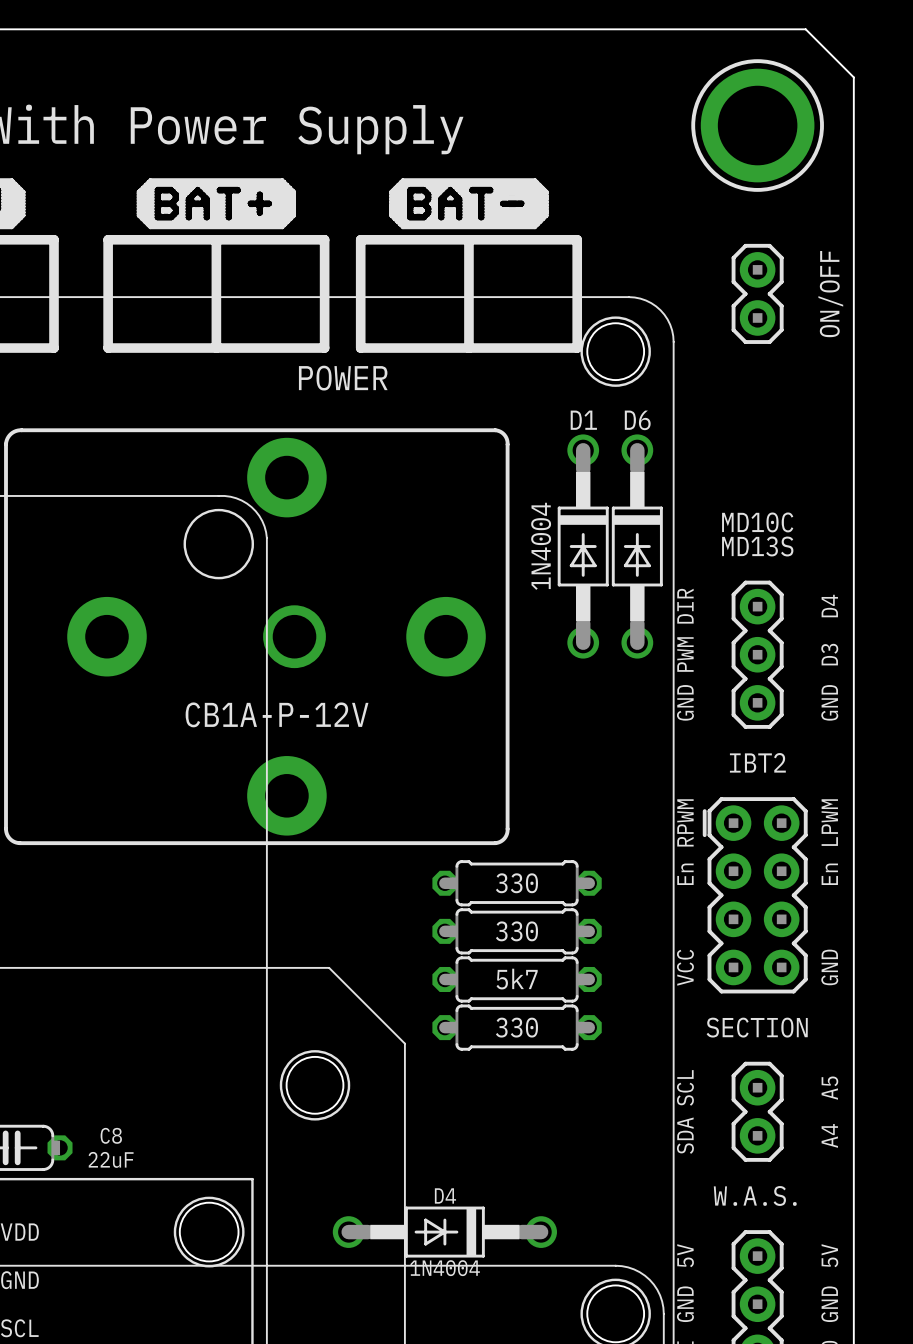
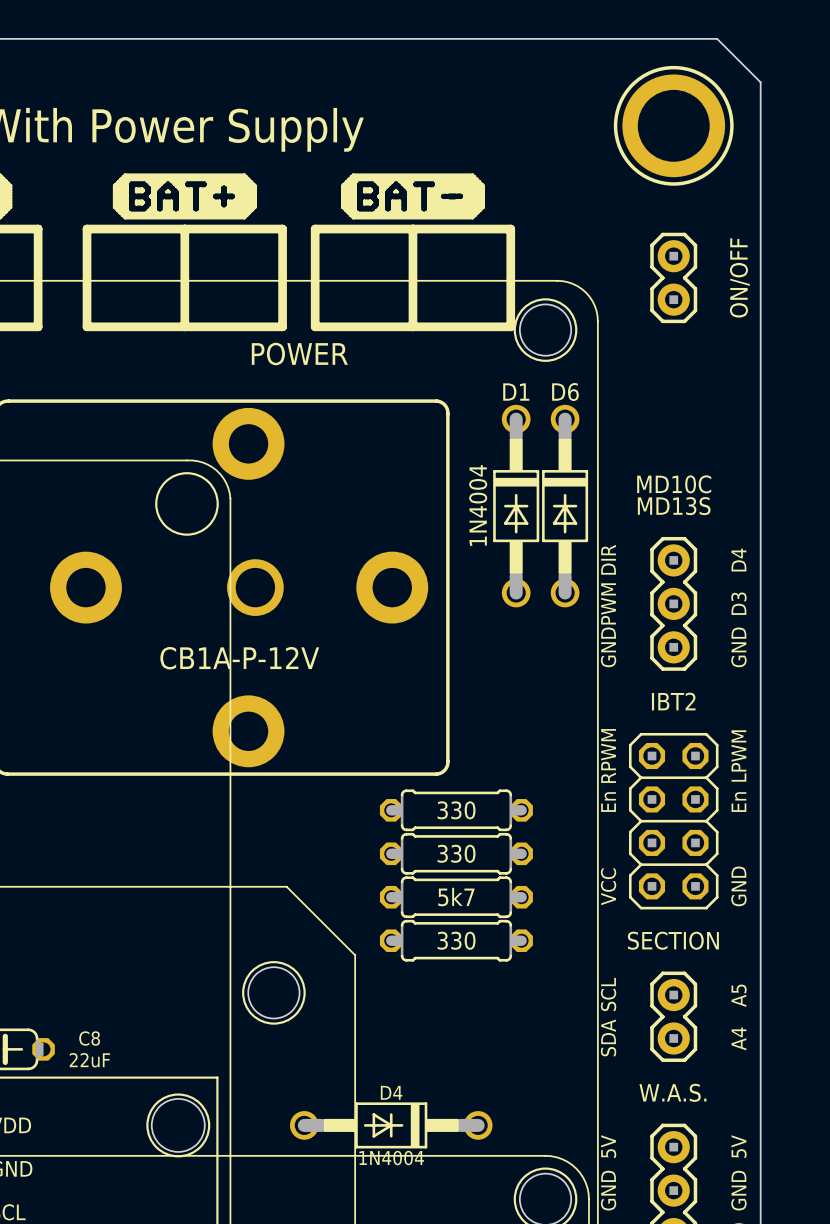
IBT2 footprint: [702, 797, 808, 994] -> [628, 732, 719, 910]

